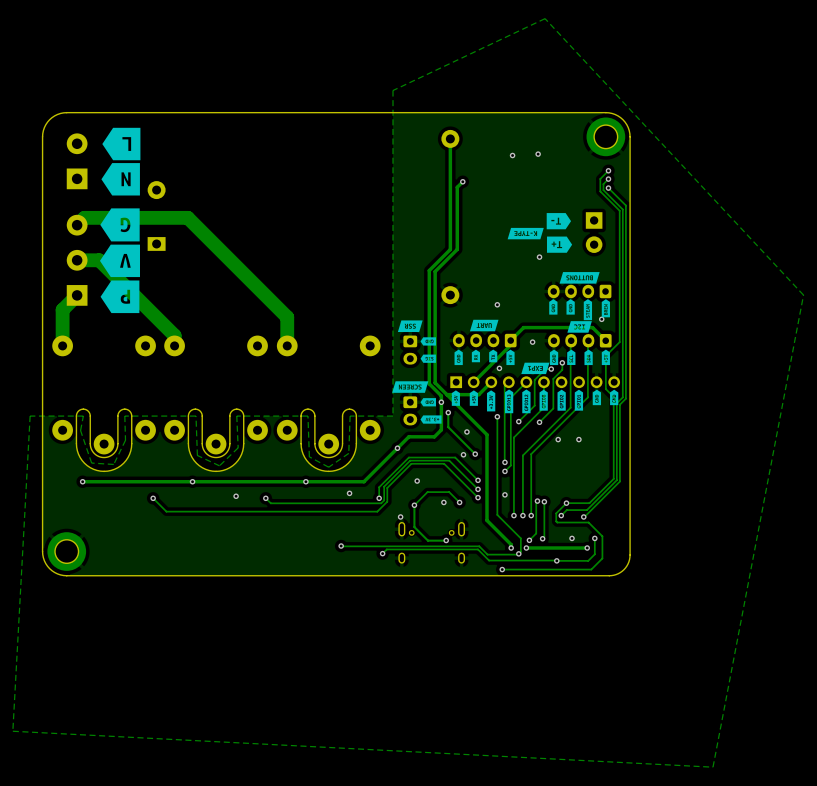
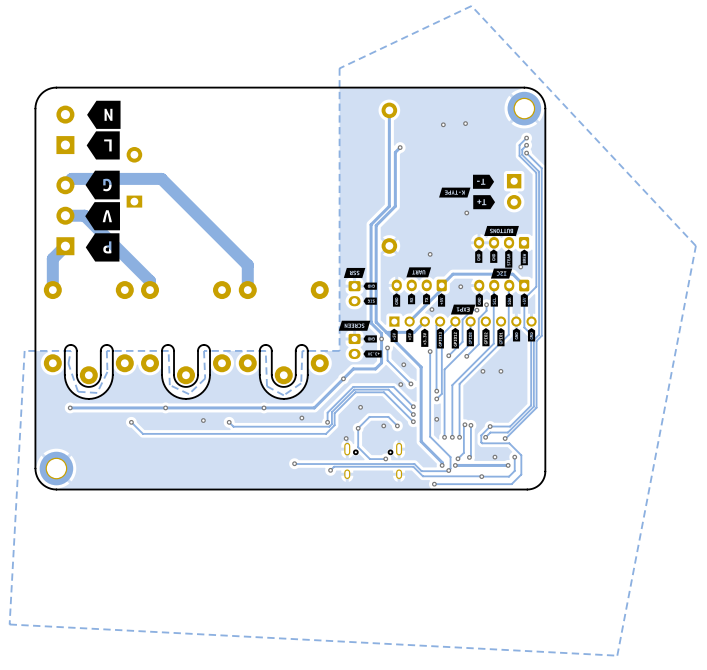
drawing position: (121, 144) -> (103, 145)
drawing position: (120, 179) -> (103, 114)

